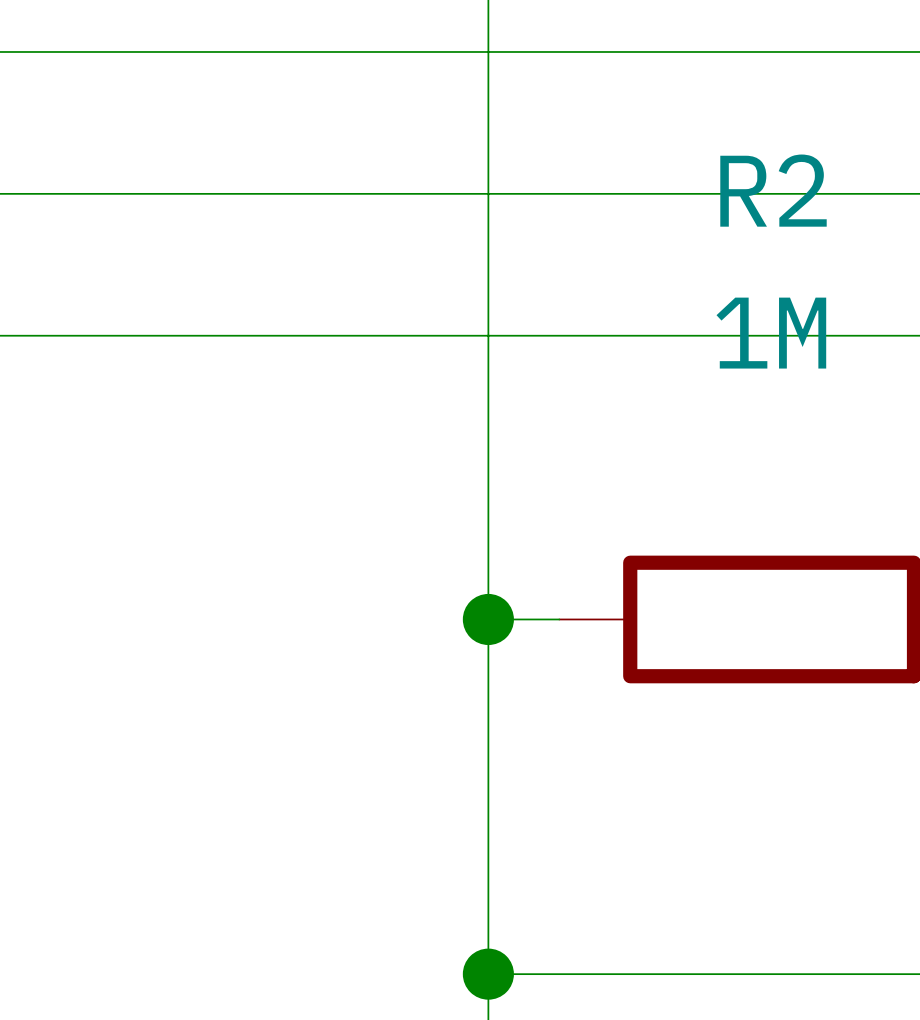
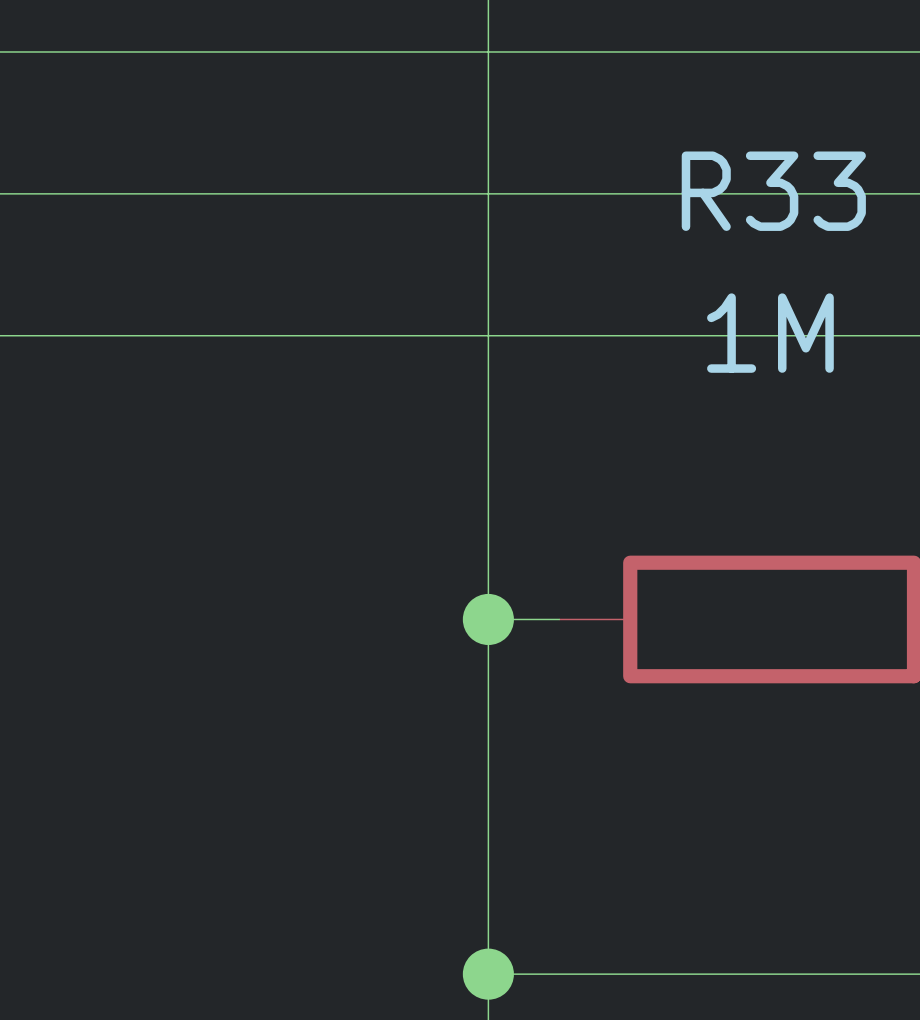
R2 name: R2 (773, 190) -> R33 (773, 191)

